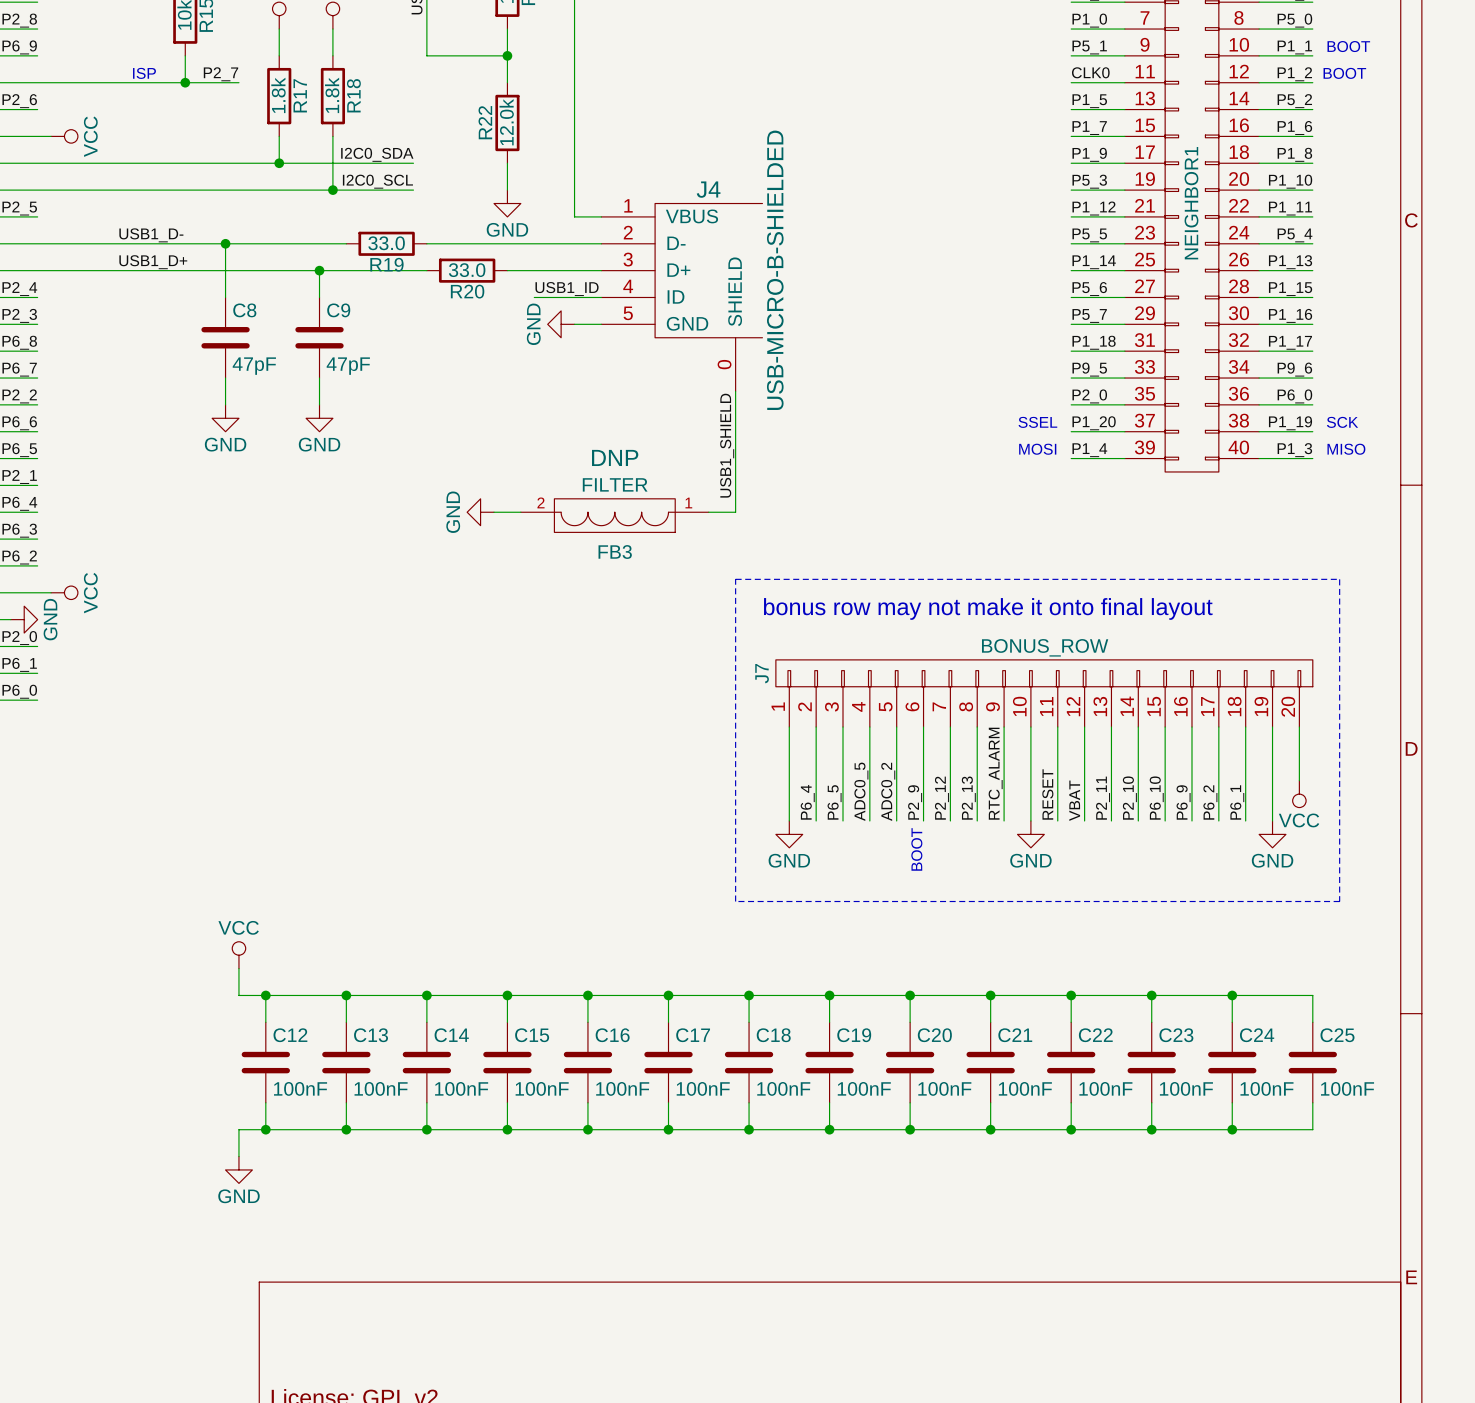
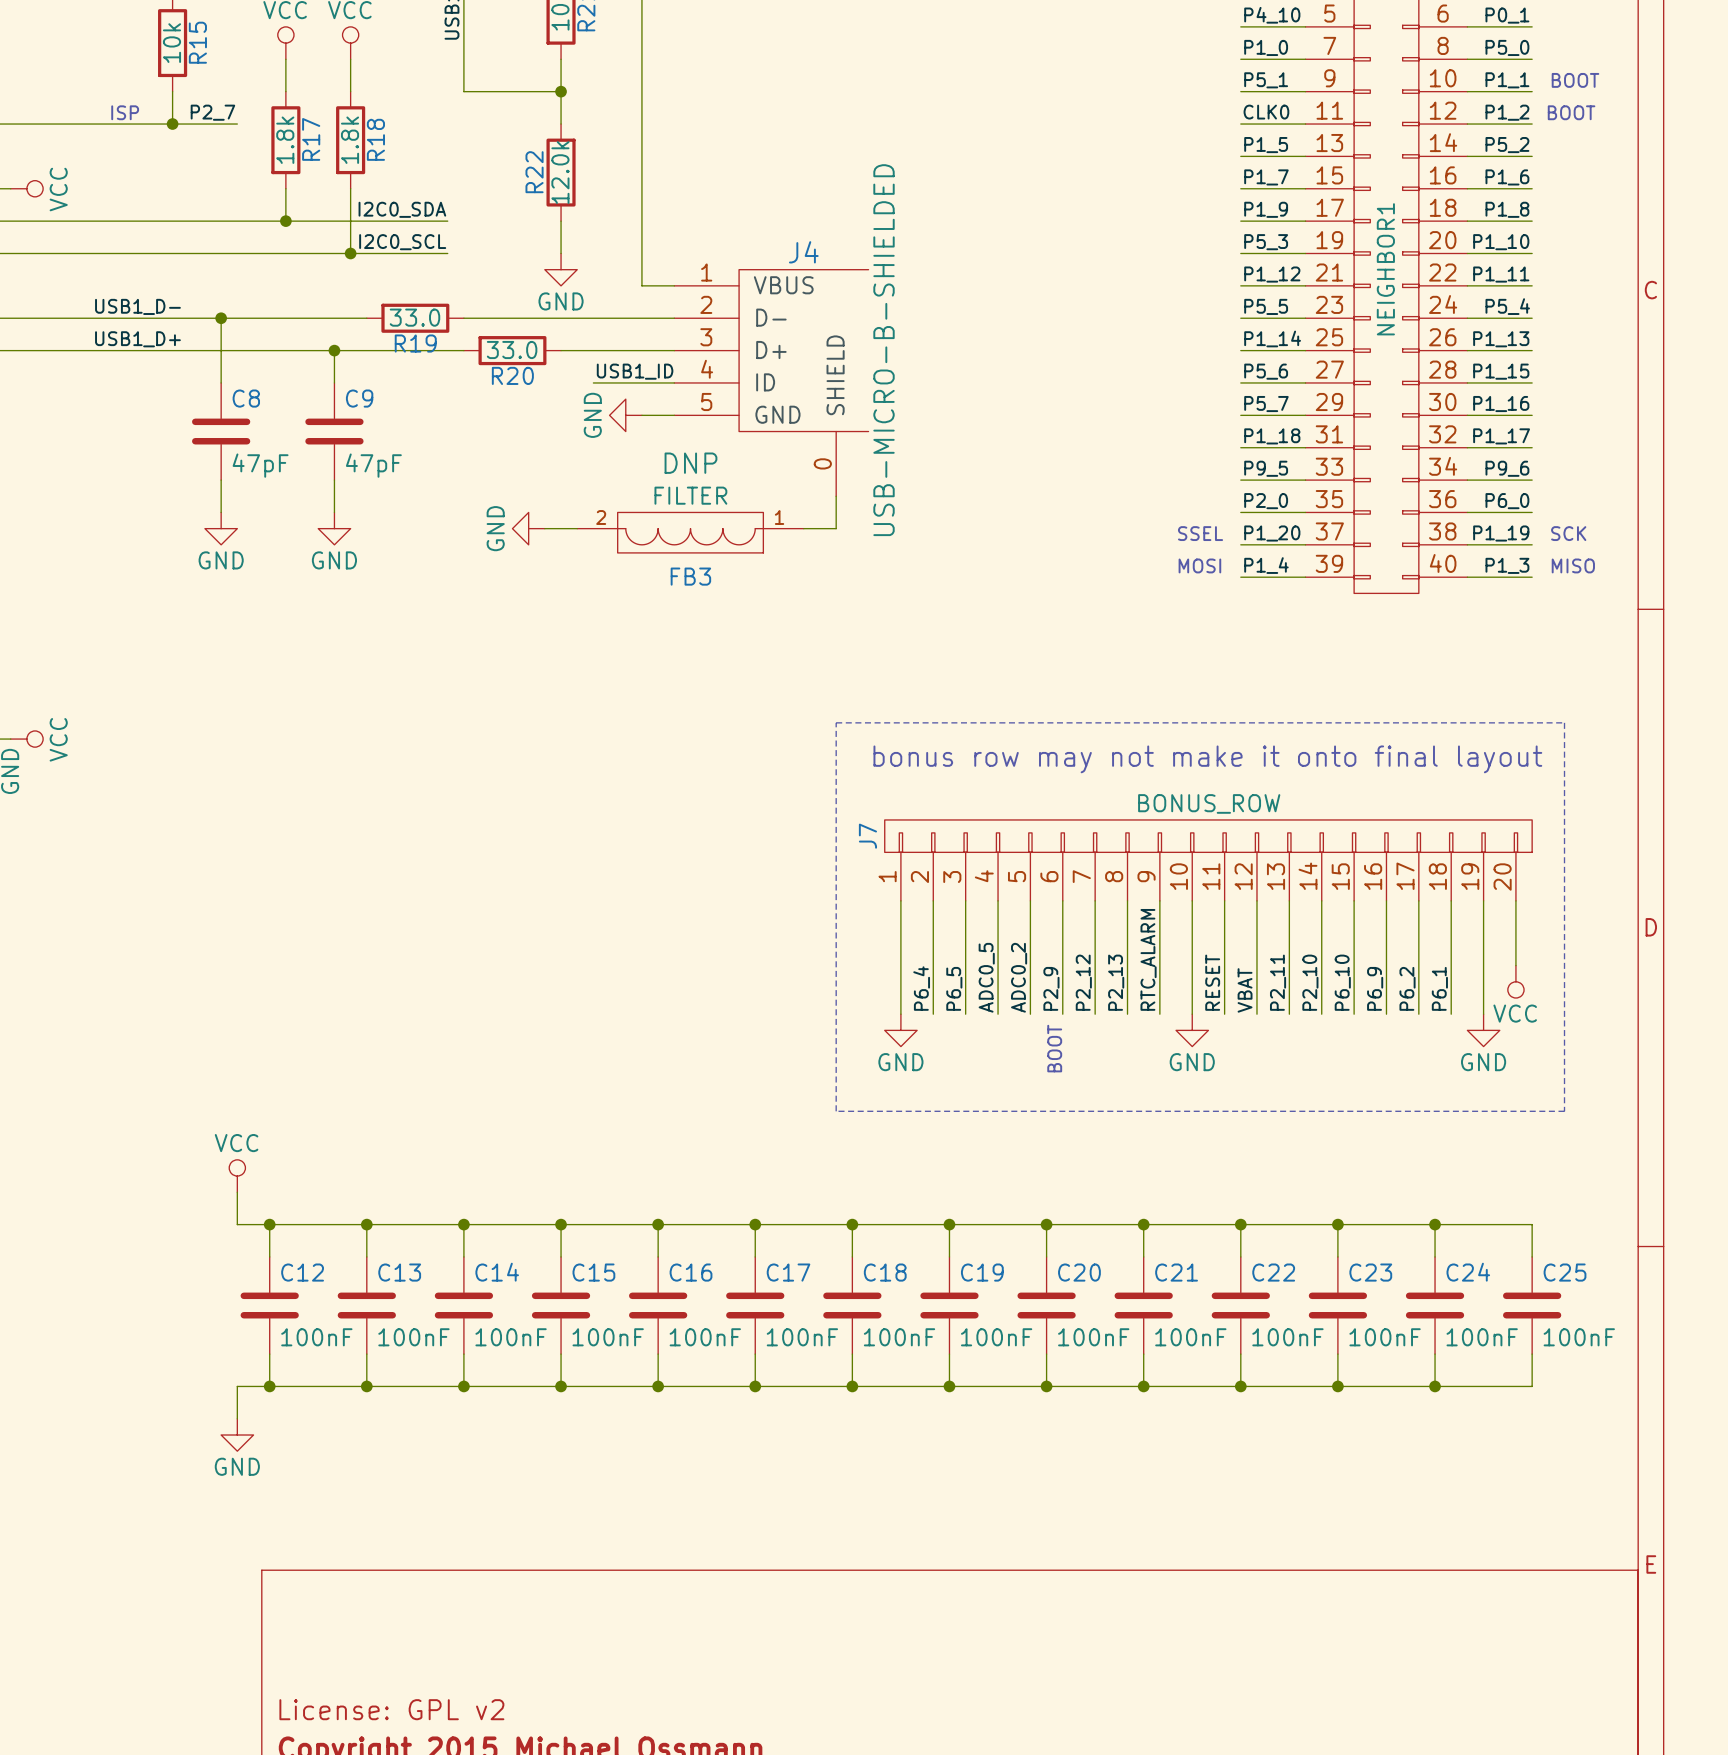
wire: (735, 418) (735, 512) (708, 512) -> (836, 528) (803, 528)
label: USB1_SHIELD (727, 445) -> none
power symbol position: GND (480, 512) -> GND (528, 528)
wire: (494, 512) (520, 512) -> (544, 528) (577, 528)
FB3 position: (614, 515) -> (690, 532)

